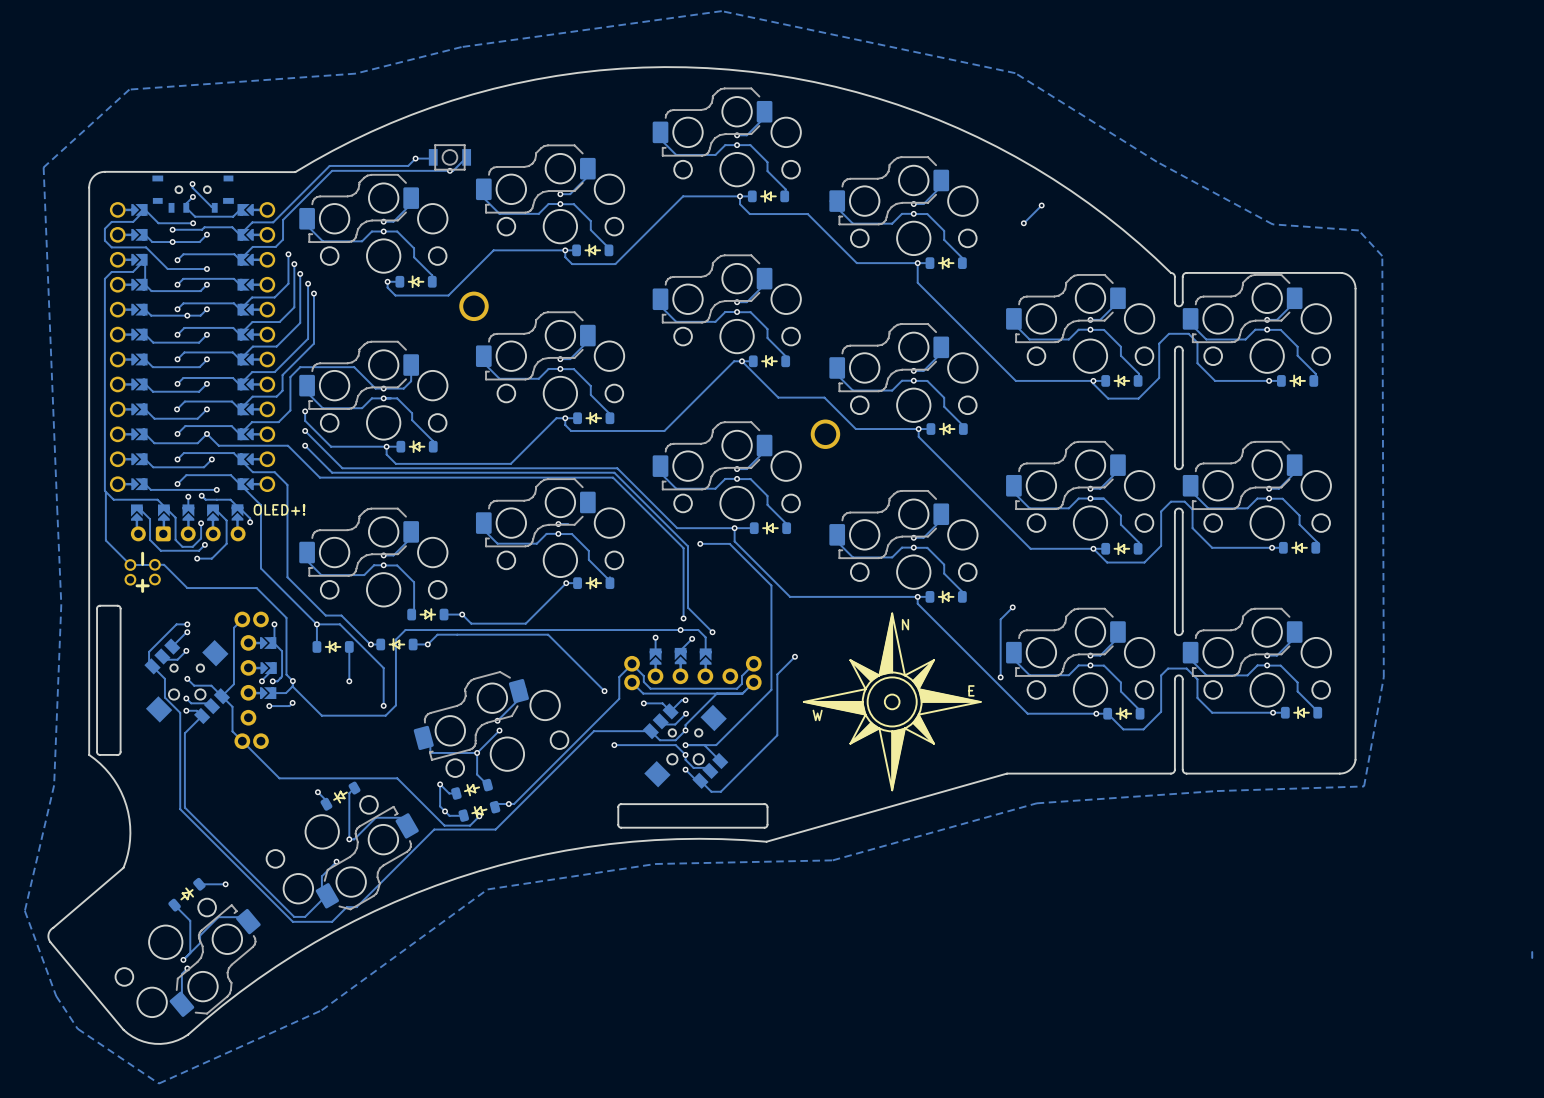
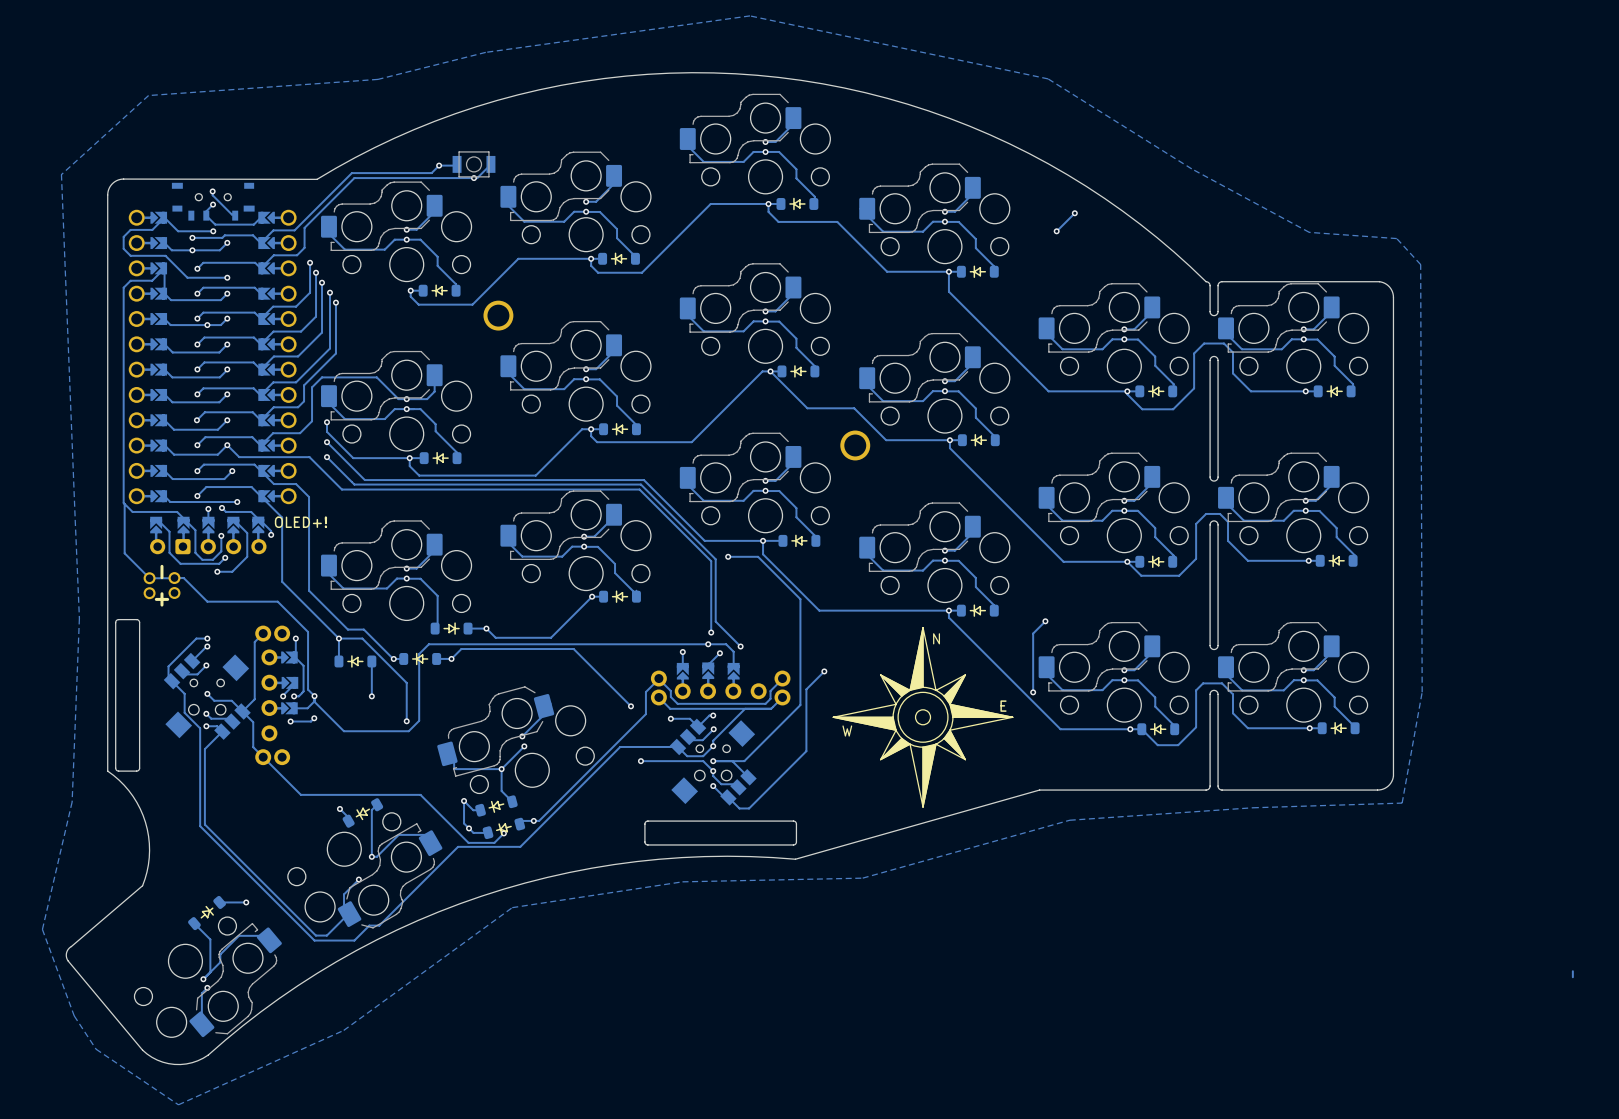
track: none -> (614, 514) (594, 536)

